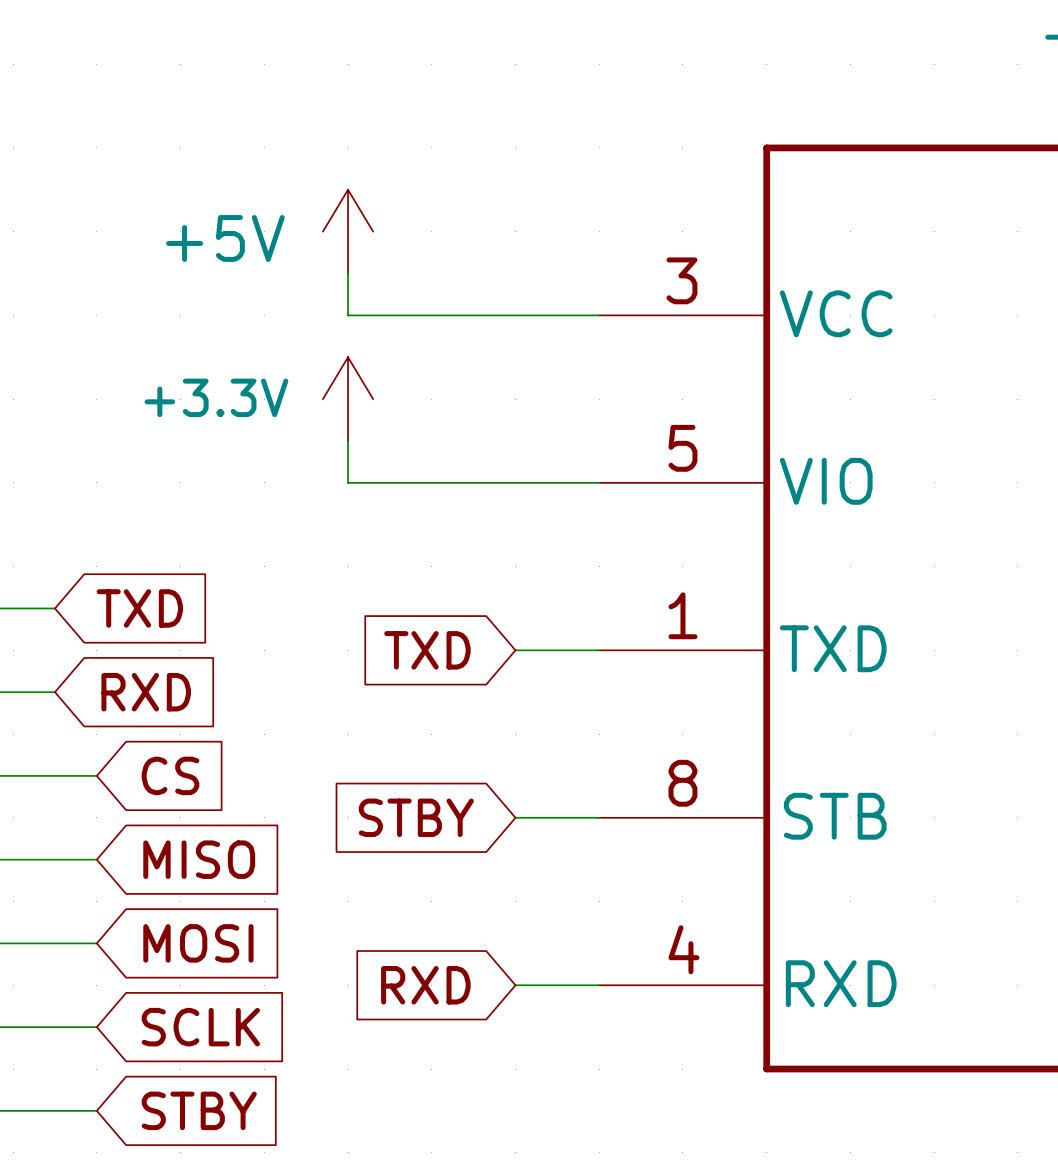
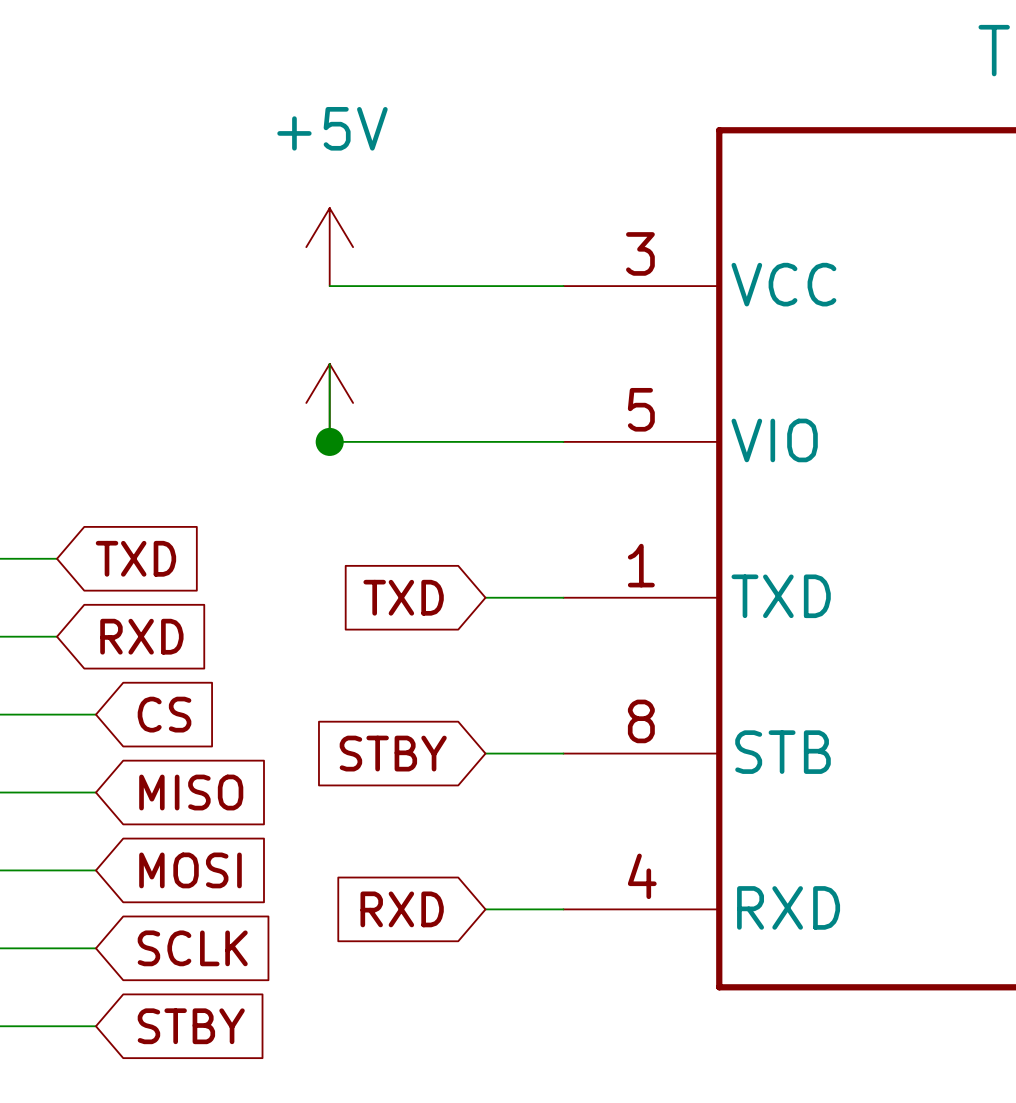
power symbol position: +5V (348, 231) -> +5V (329, 247)
power symbol text position: +5V (225, 238) -> +5V (332, 128)
power symbol: +3.3V (348, 399) -> none
power symbol: none -> (329, 402)
junction: none -> (329, 441)

